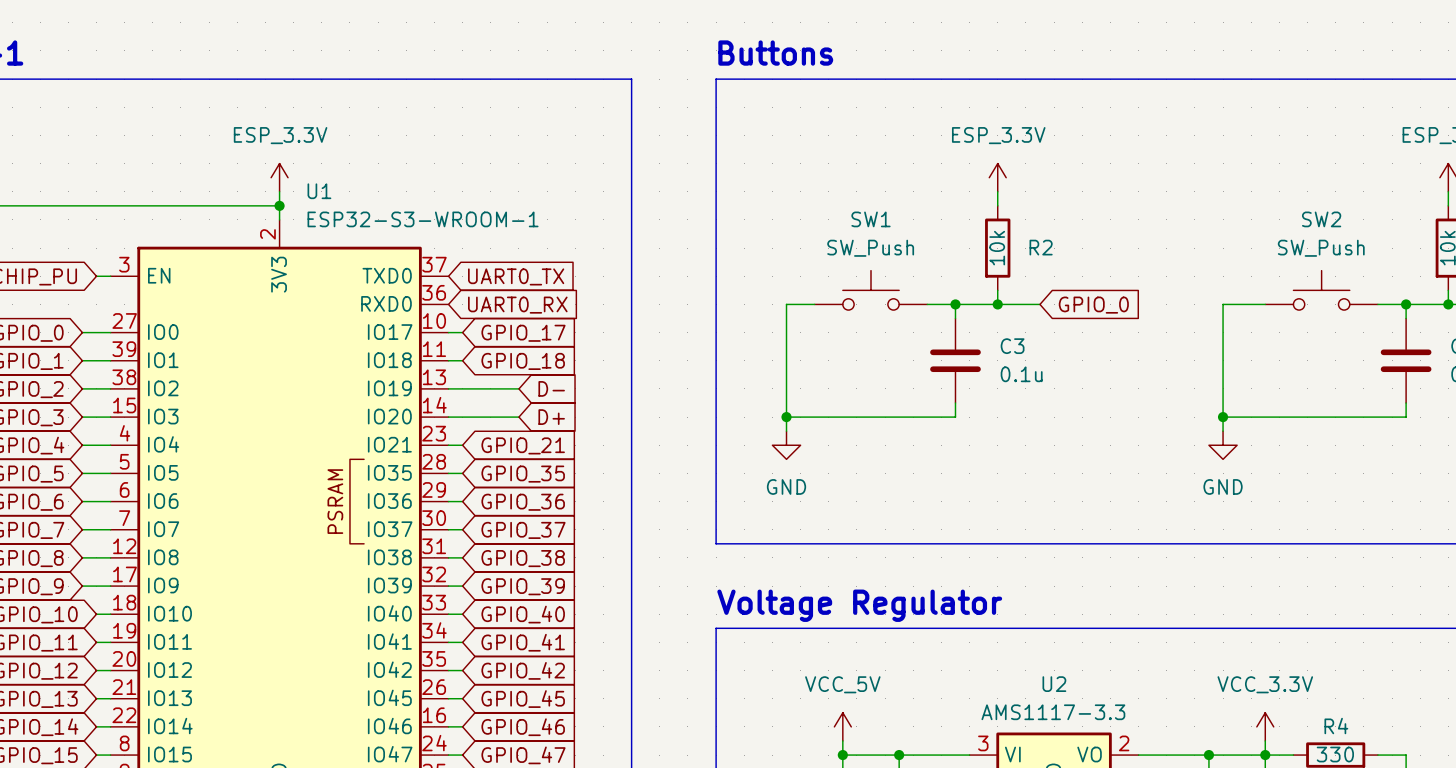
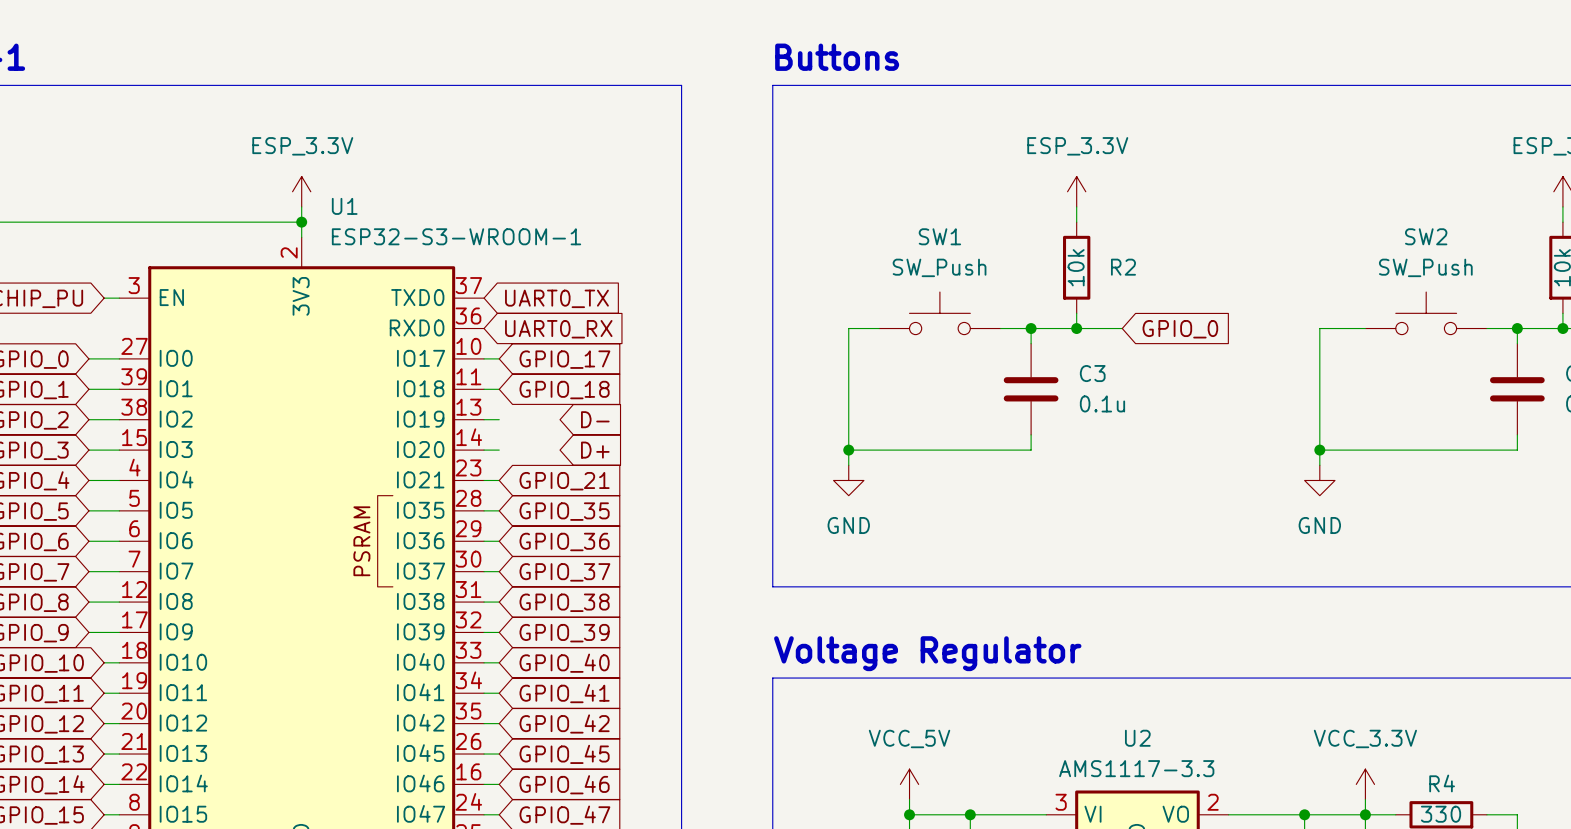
wire: (462, 388) (518, 388) -> none
wire: (462, 417) (518, 417) -> none

